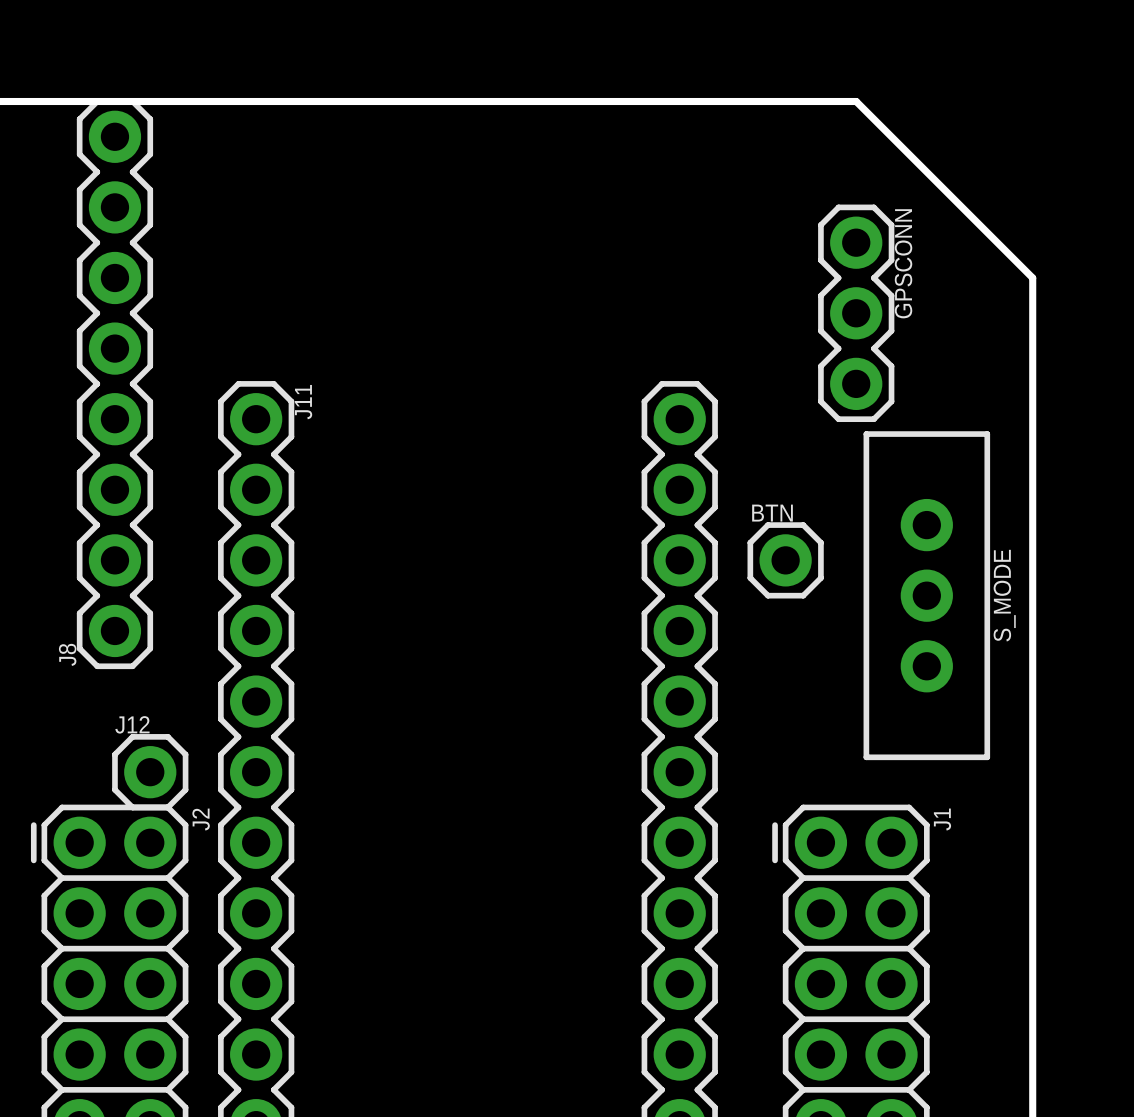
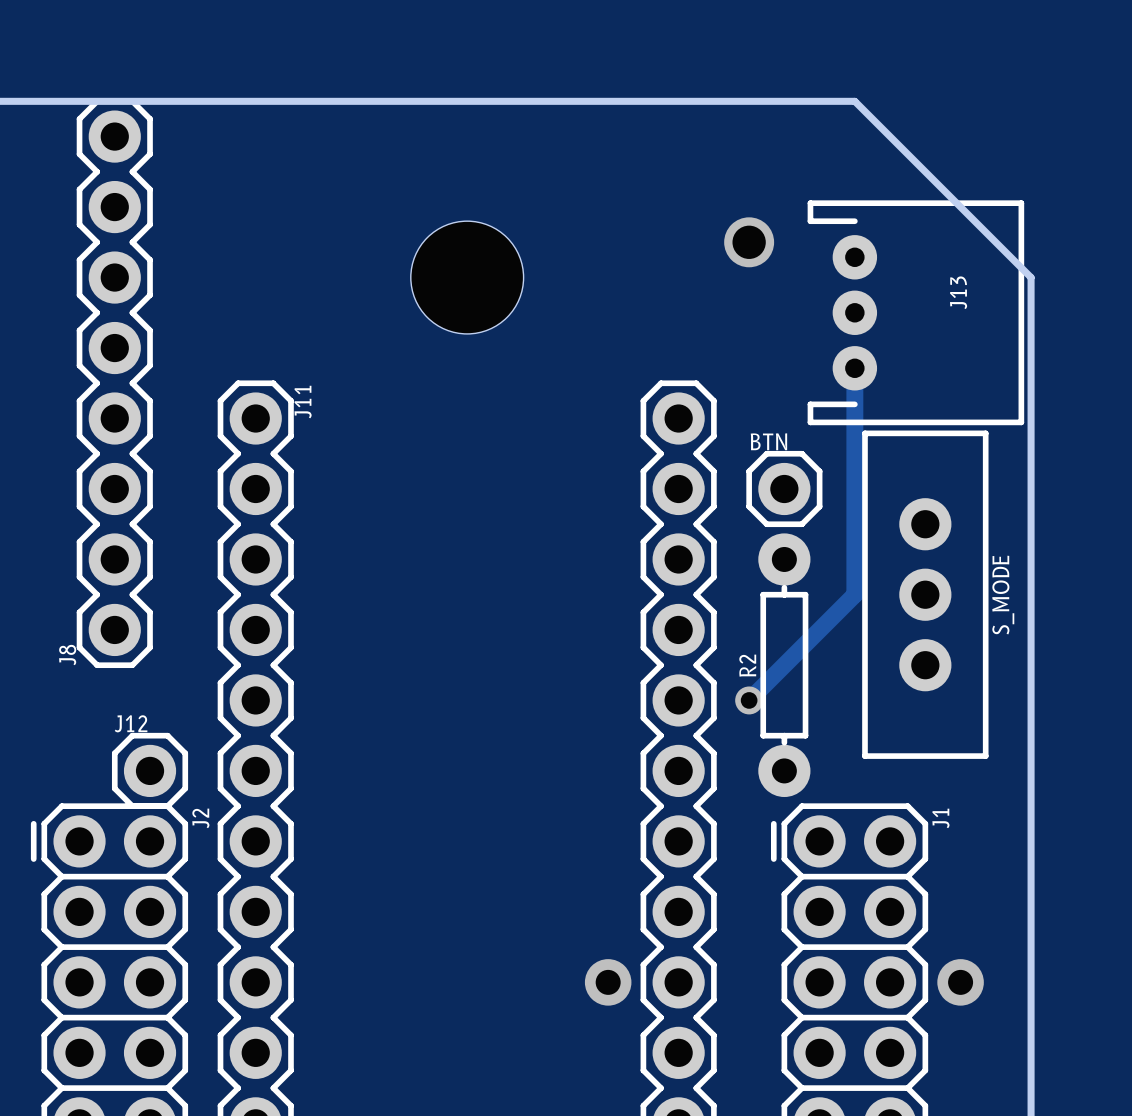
via: none -> (749, 242)
hole: none -> (467, 277)
GPSCONN: (856, 313) -> none
J13: none -> (915, 312)
track: none -> (854, 383) (854, 594) (749, 700)
BTN position: (785, 560) -> (784, 488)
R2: none -> (784, 665)
via: none -> (749, 700)
via: none -> (608, 982)
via: none -> (960, 982)

